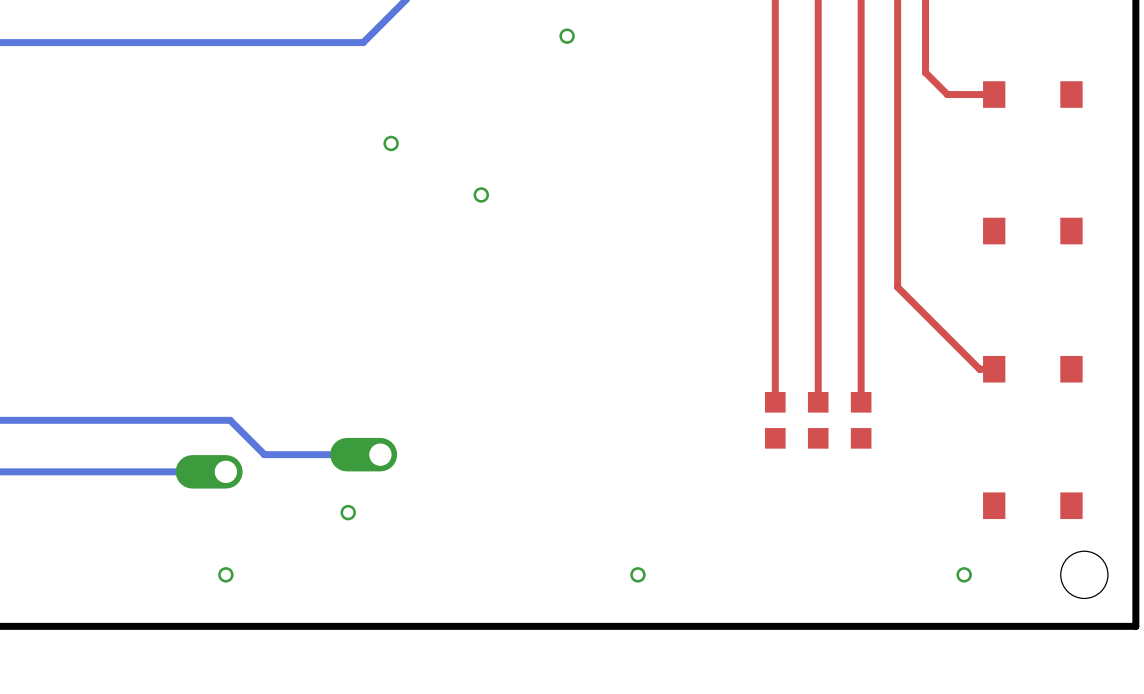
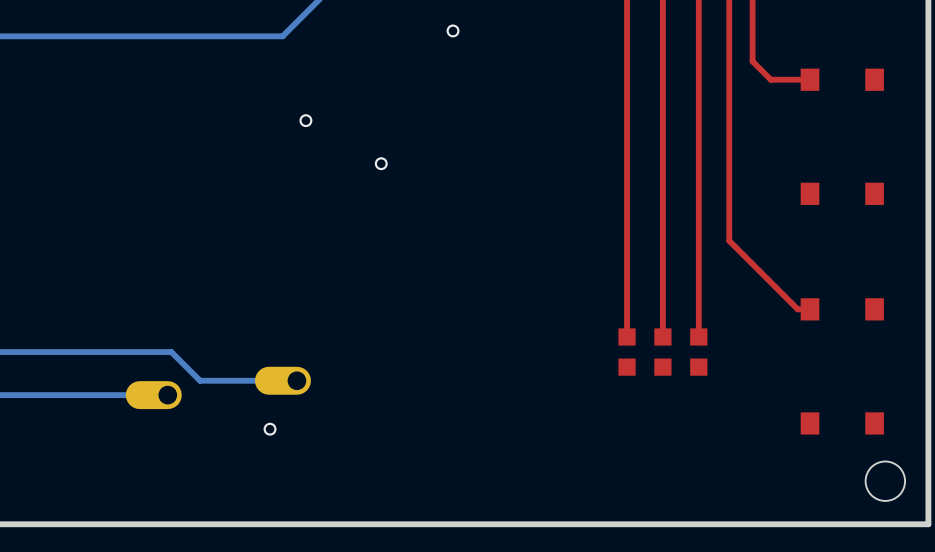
via: (225, 574) -> none
via: (637, 574) -> none
via: (964, 574) -> none

